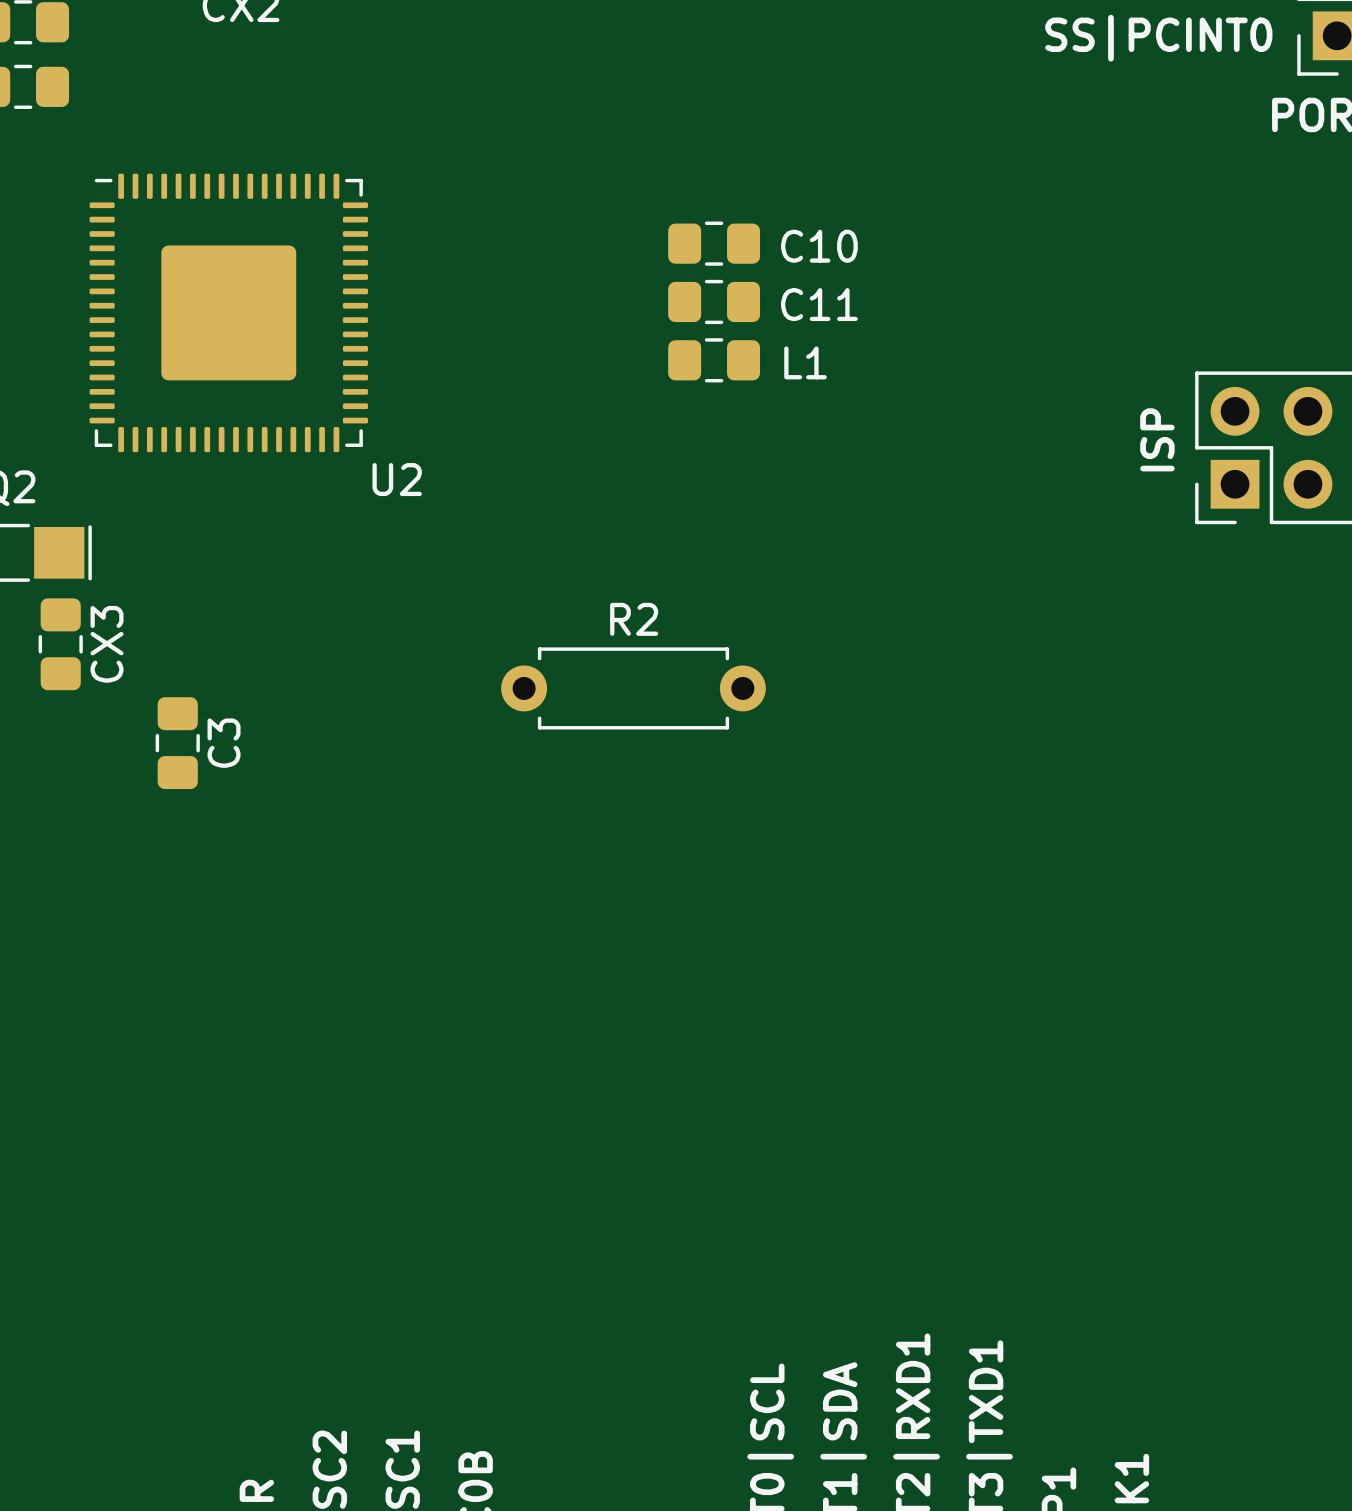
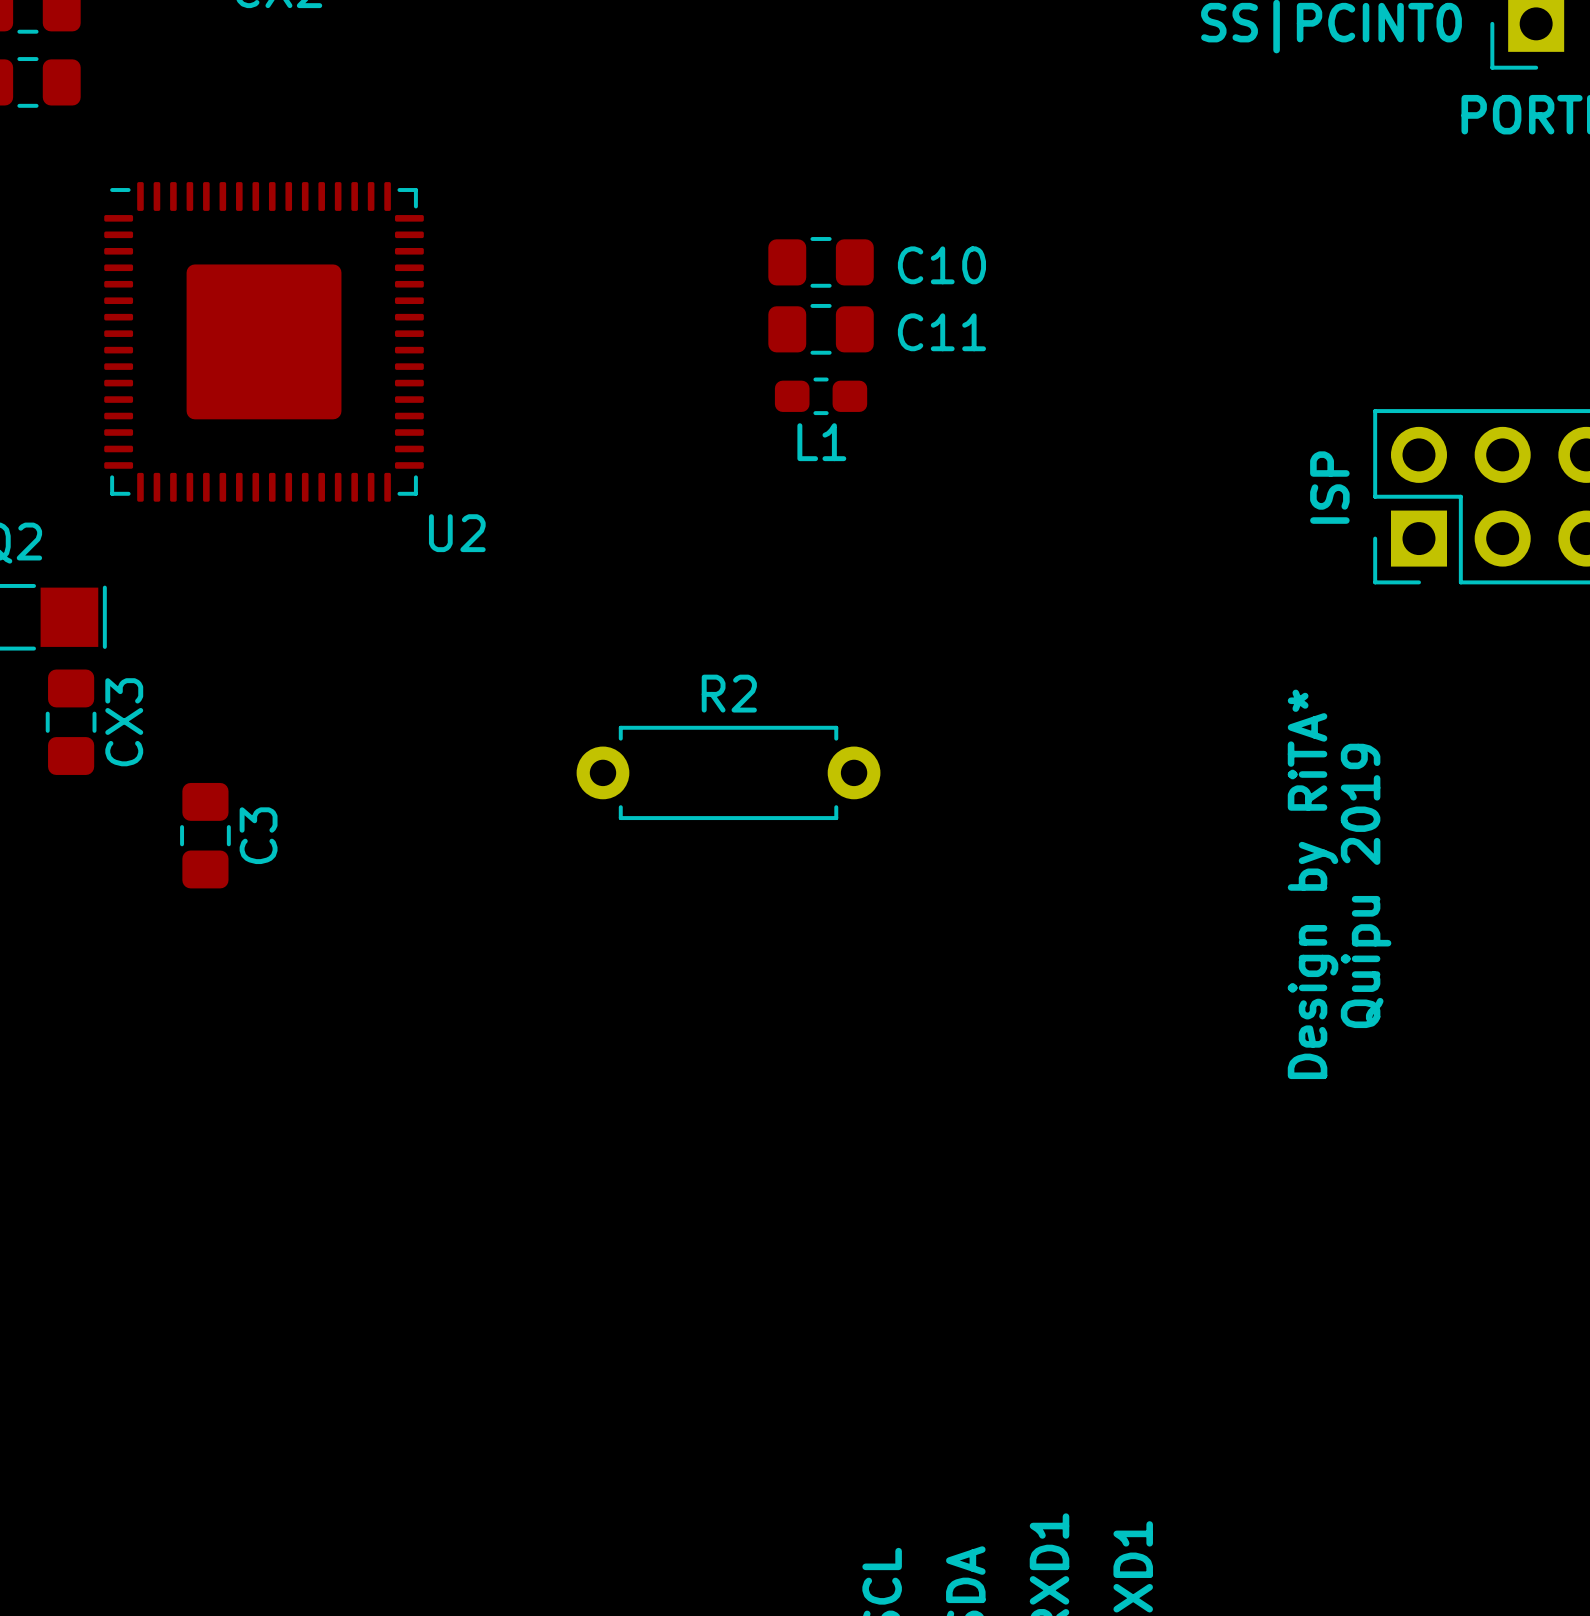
L1 footprint: [668, 338, 761, 383] -> [774, 377, 868, 416]
L1 name position: L1 (805, 362) -> L1 (821, 442)
text: none -> Design by RiTA* (1313, 884)
text: none -> Quipu 2019 (1366, 885)

